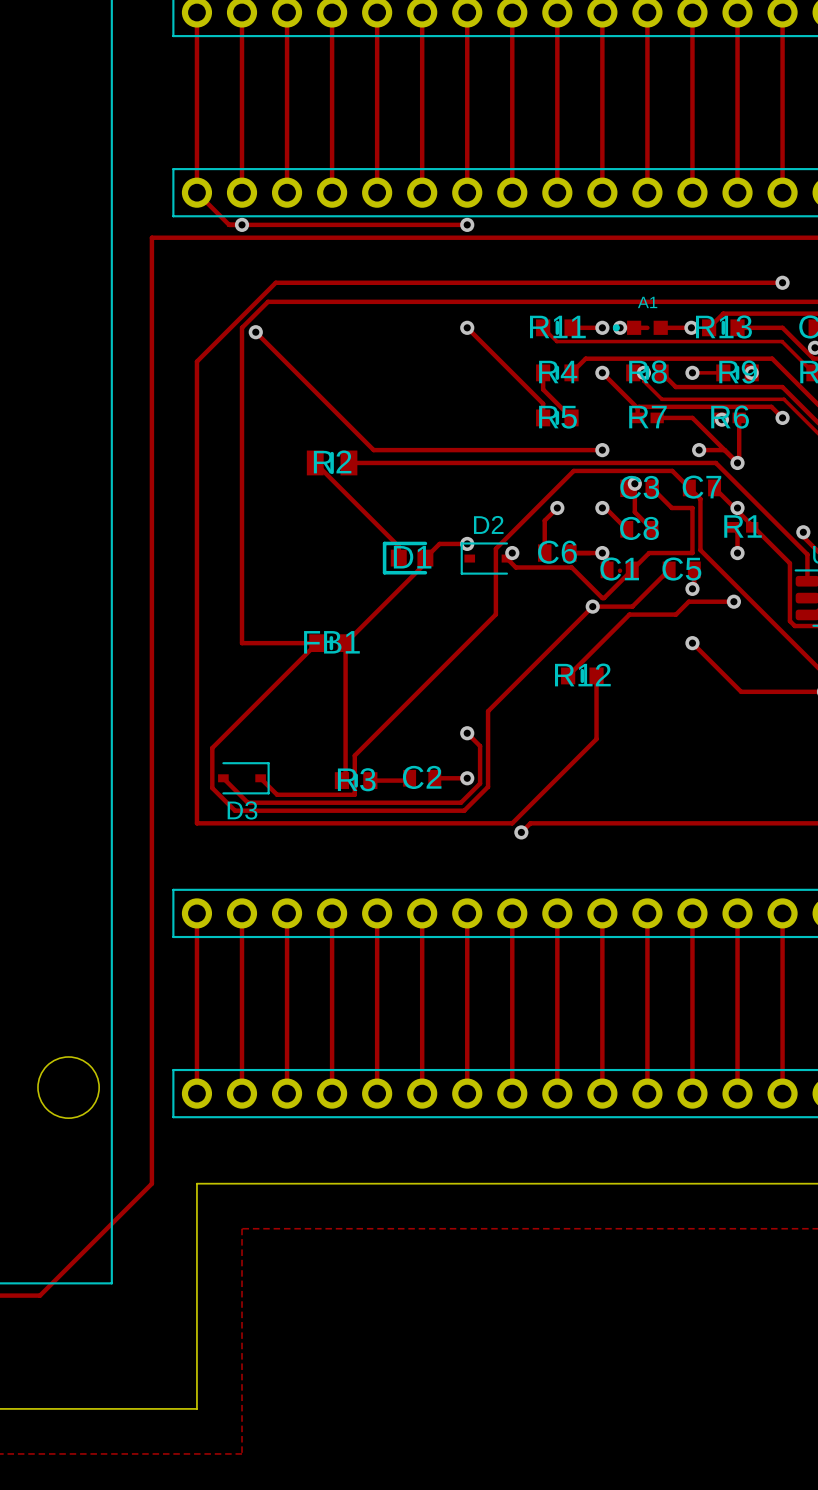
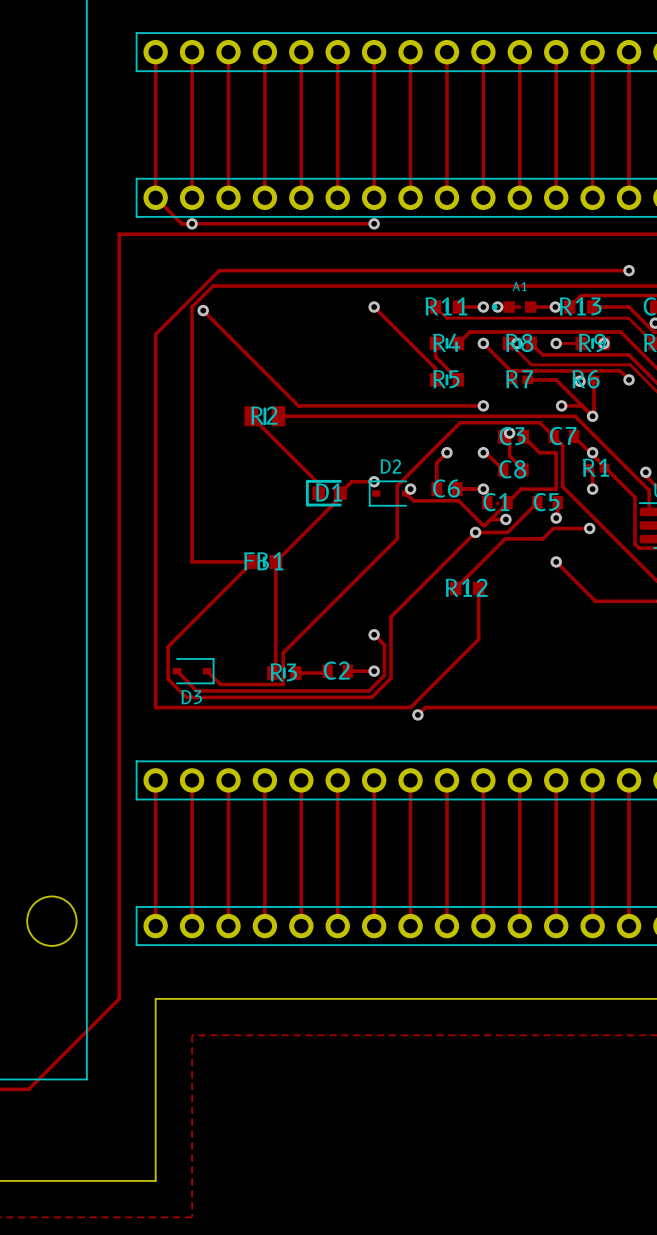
track: none -> (490, 519) (505, 519)
via: none -> (505, 519)

